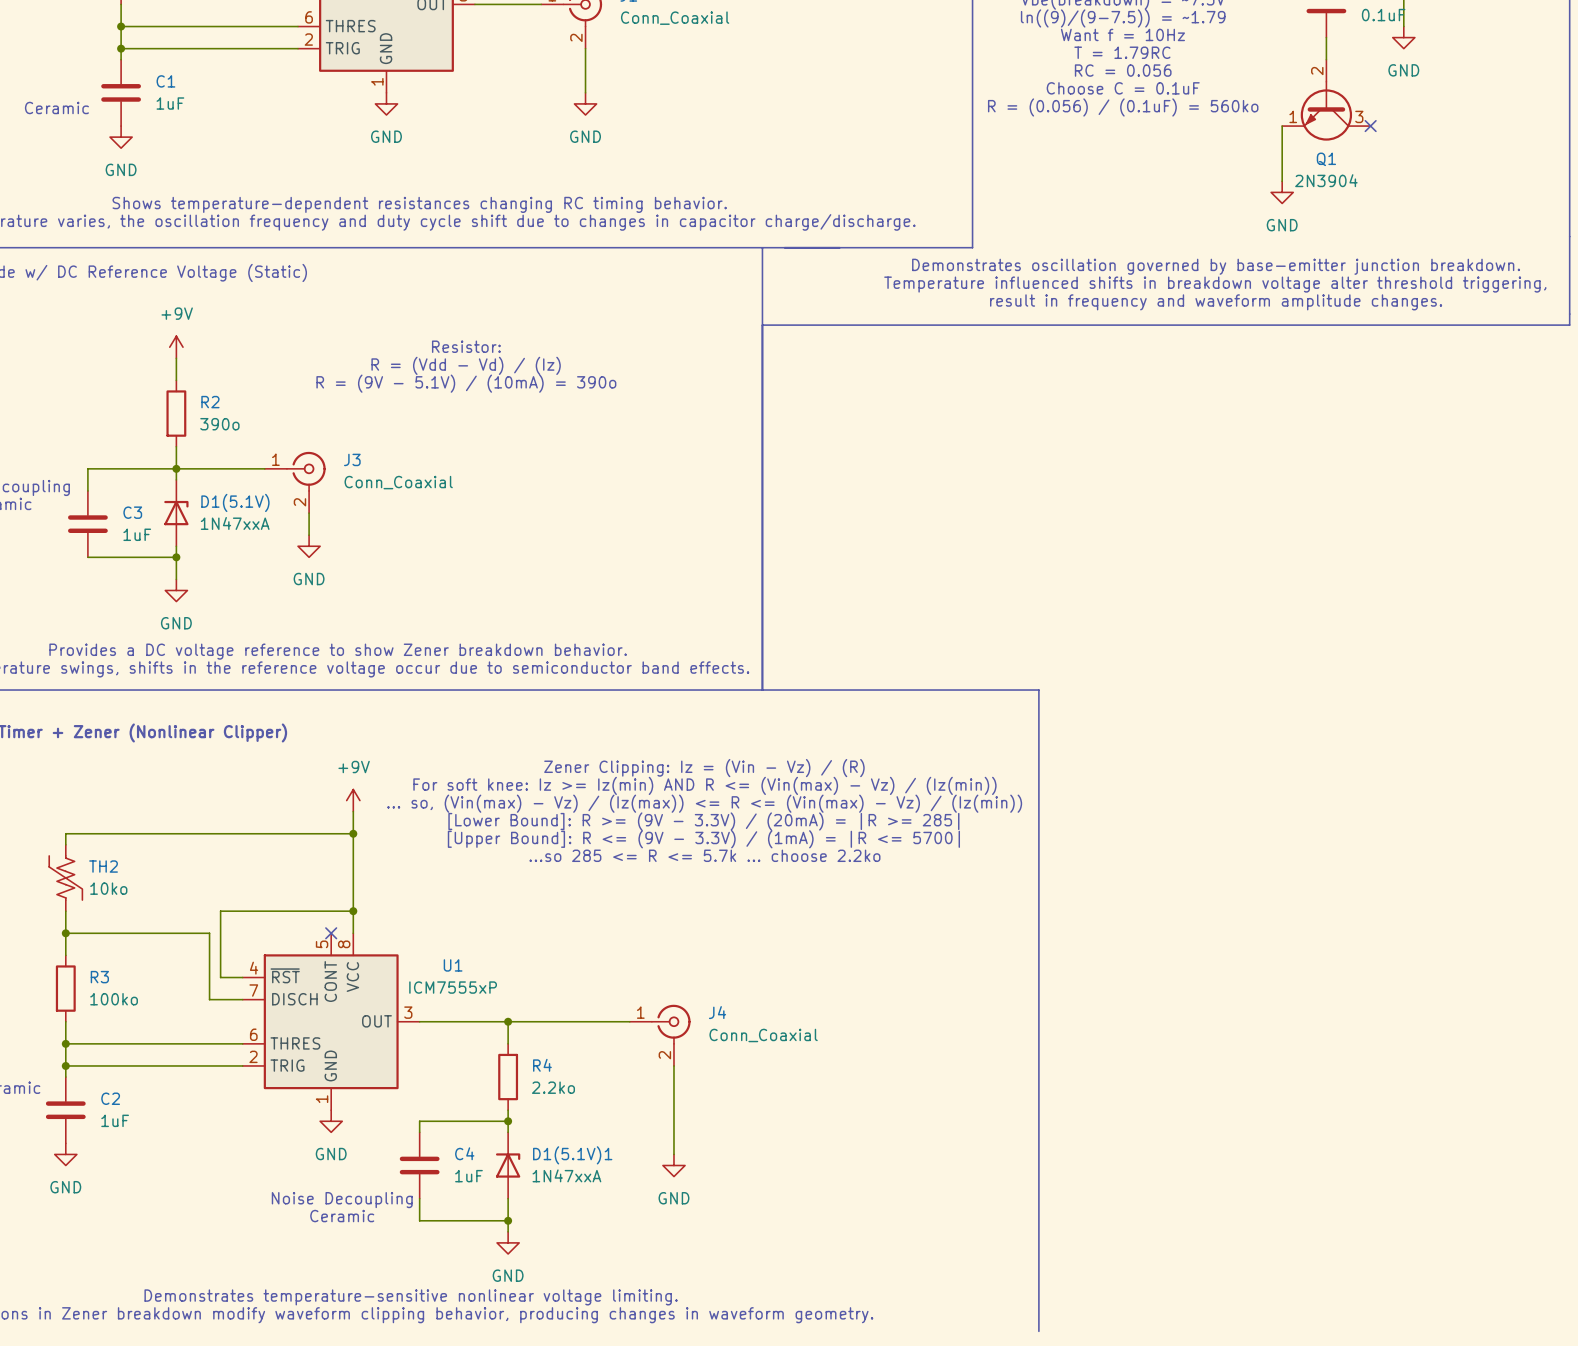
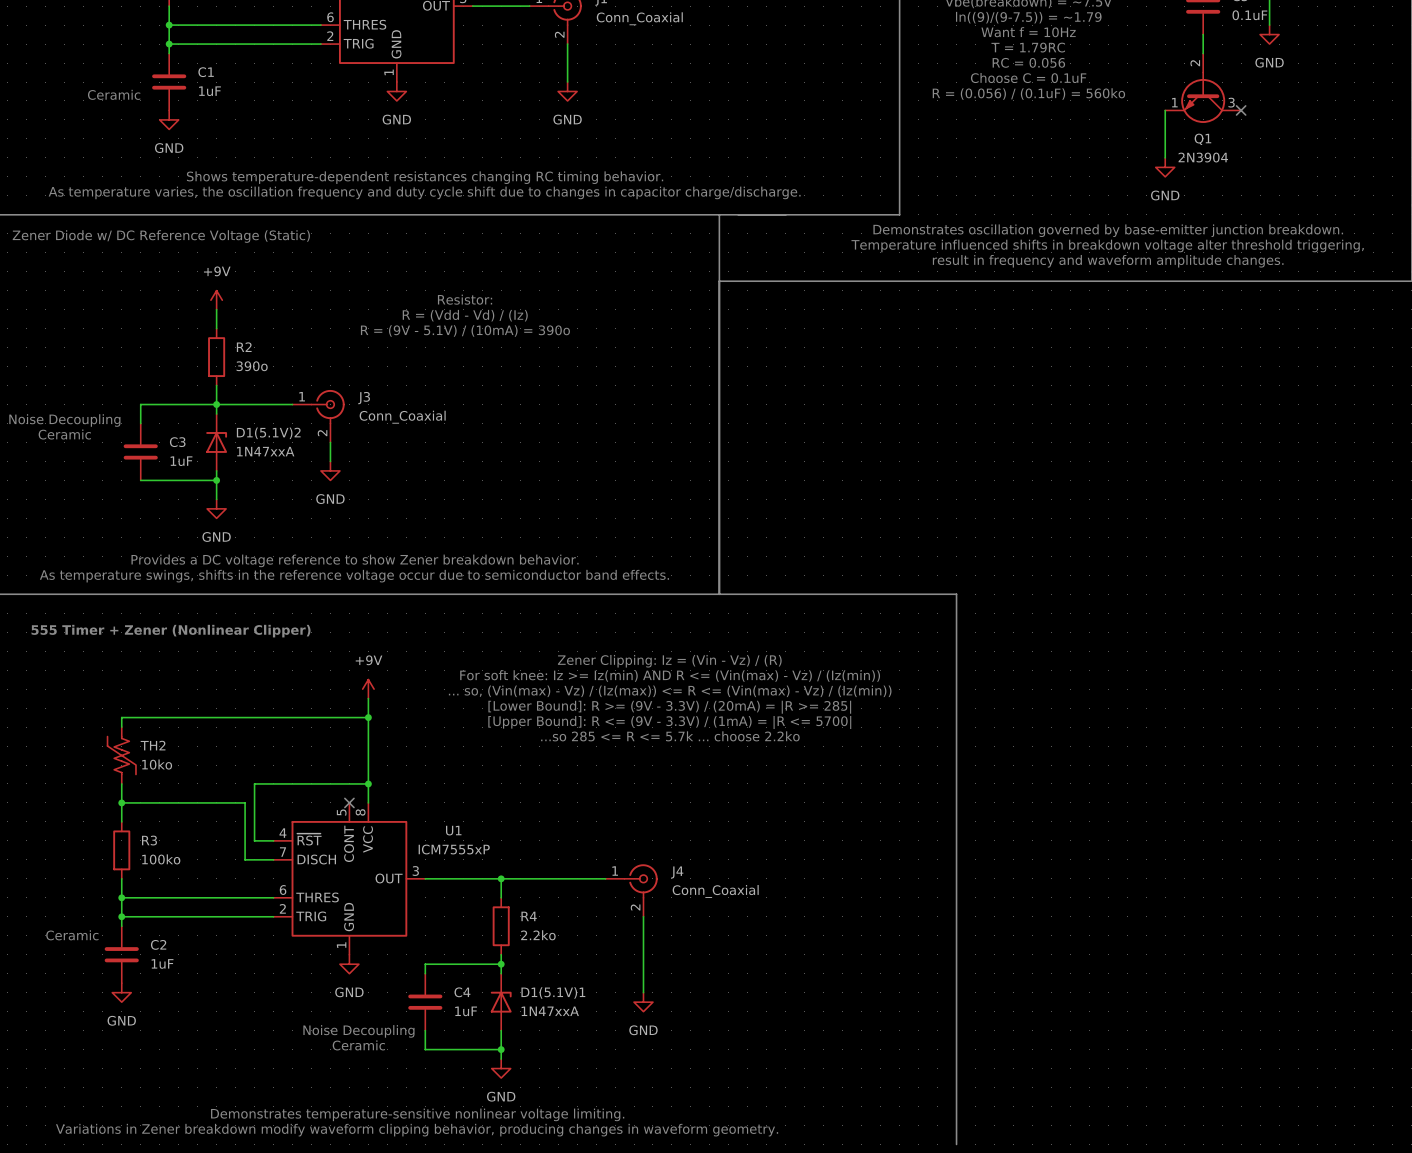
D1(5.1V) name: D1(5.1V) (235, 502) -> D1(5.1V)2 (268, 433)

